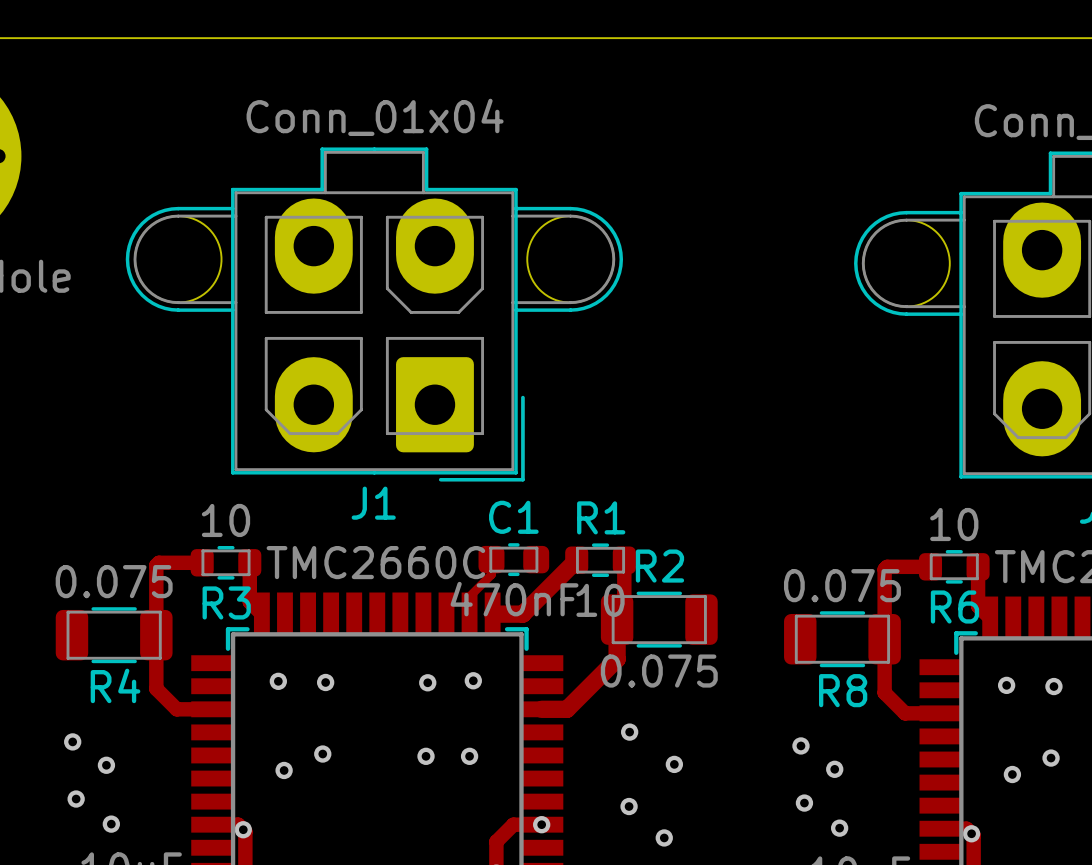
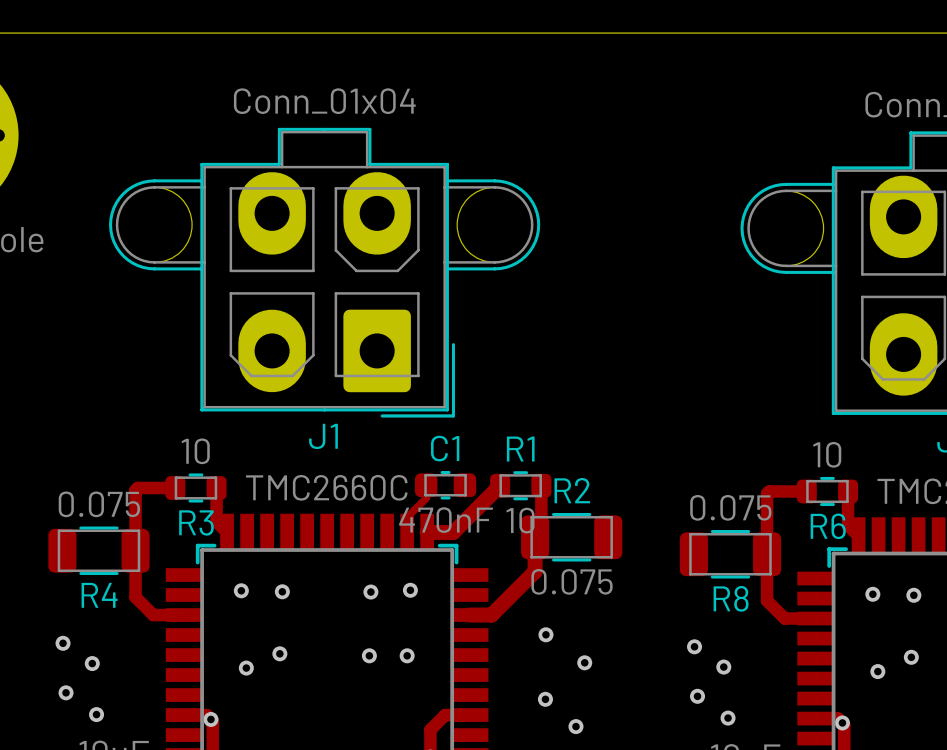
via: (541, 824) -> none

